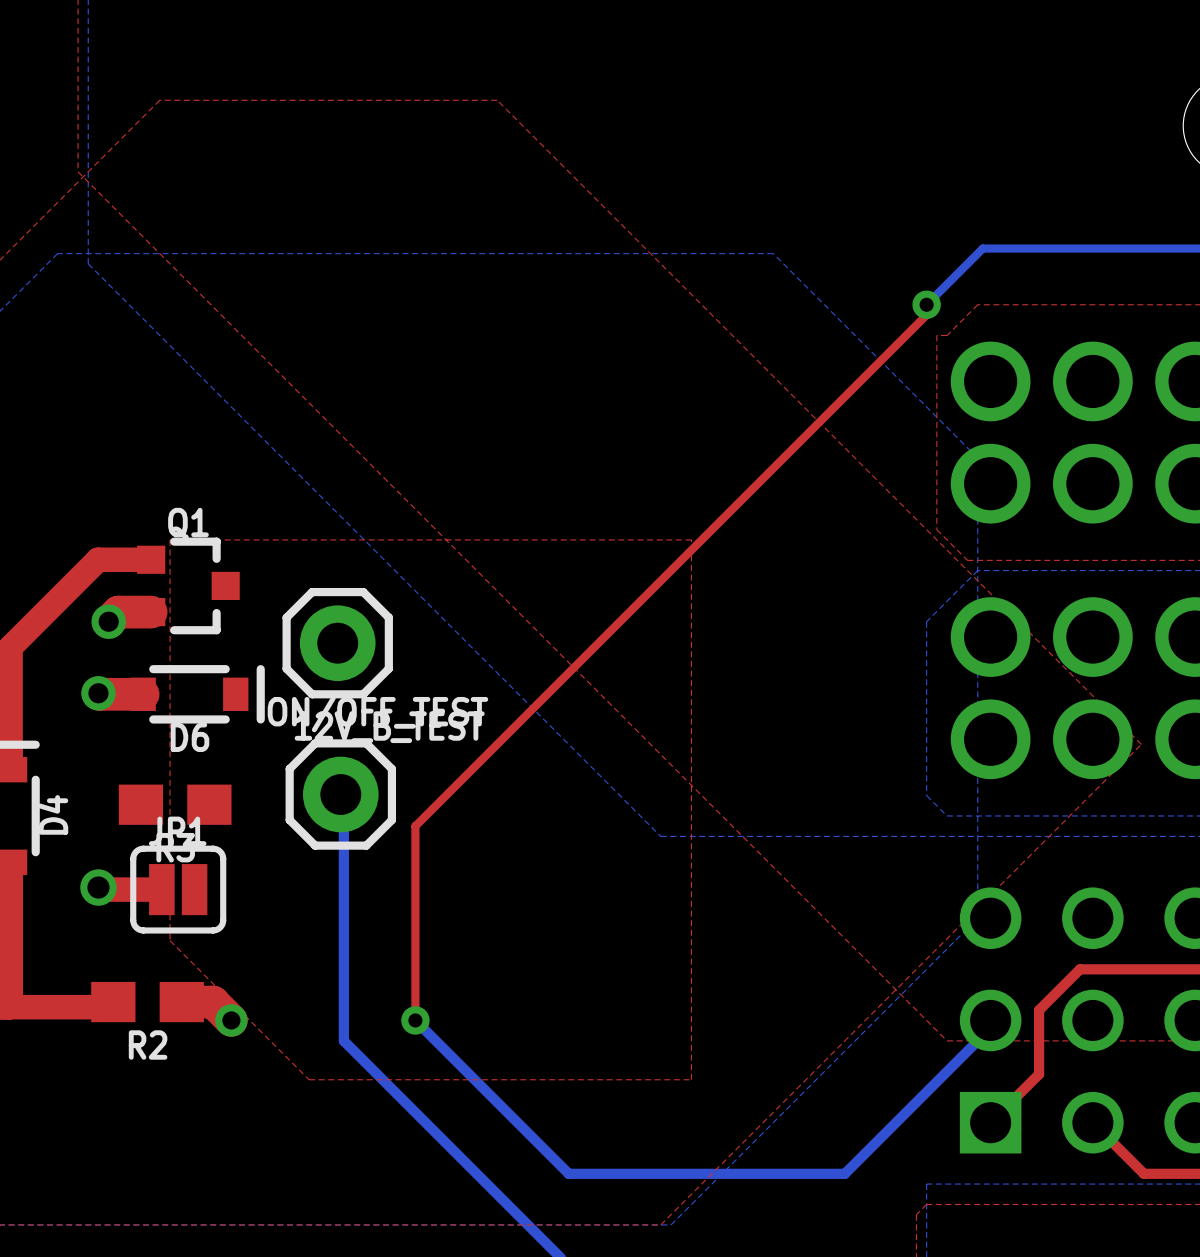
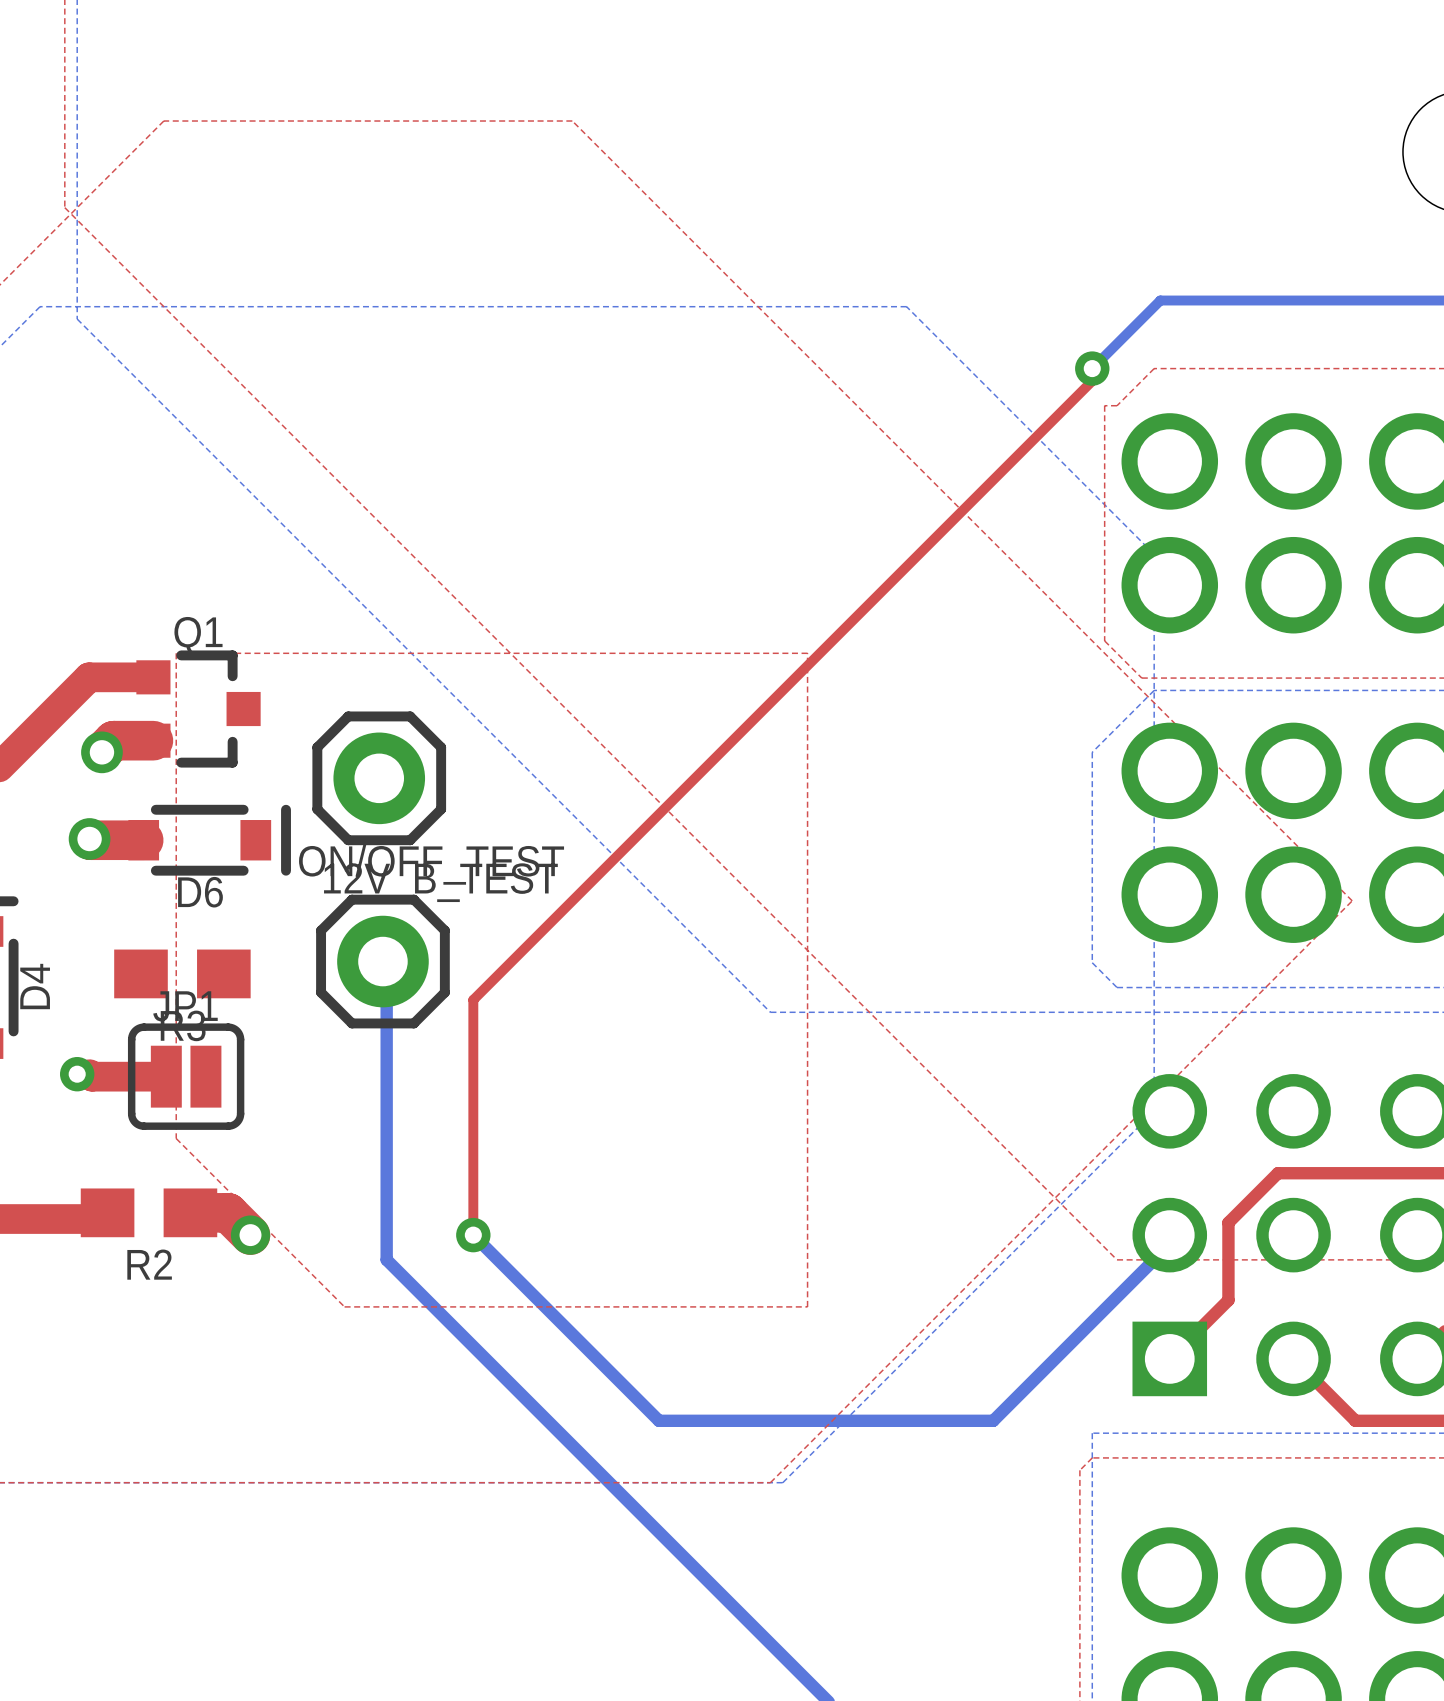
via size: [80, 869, 117, 906] -> [60, 1057, 95, 1092]

